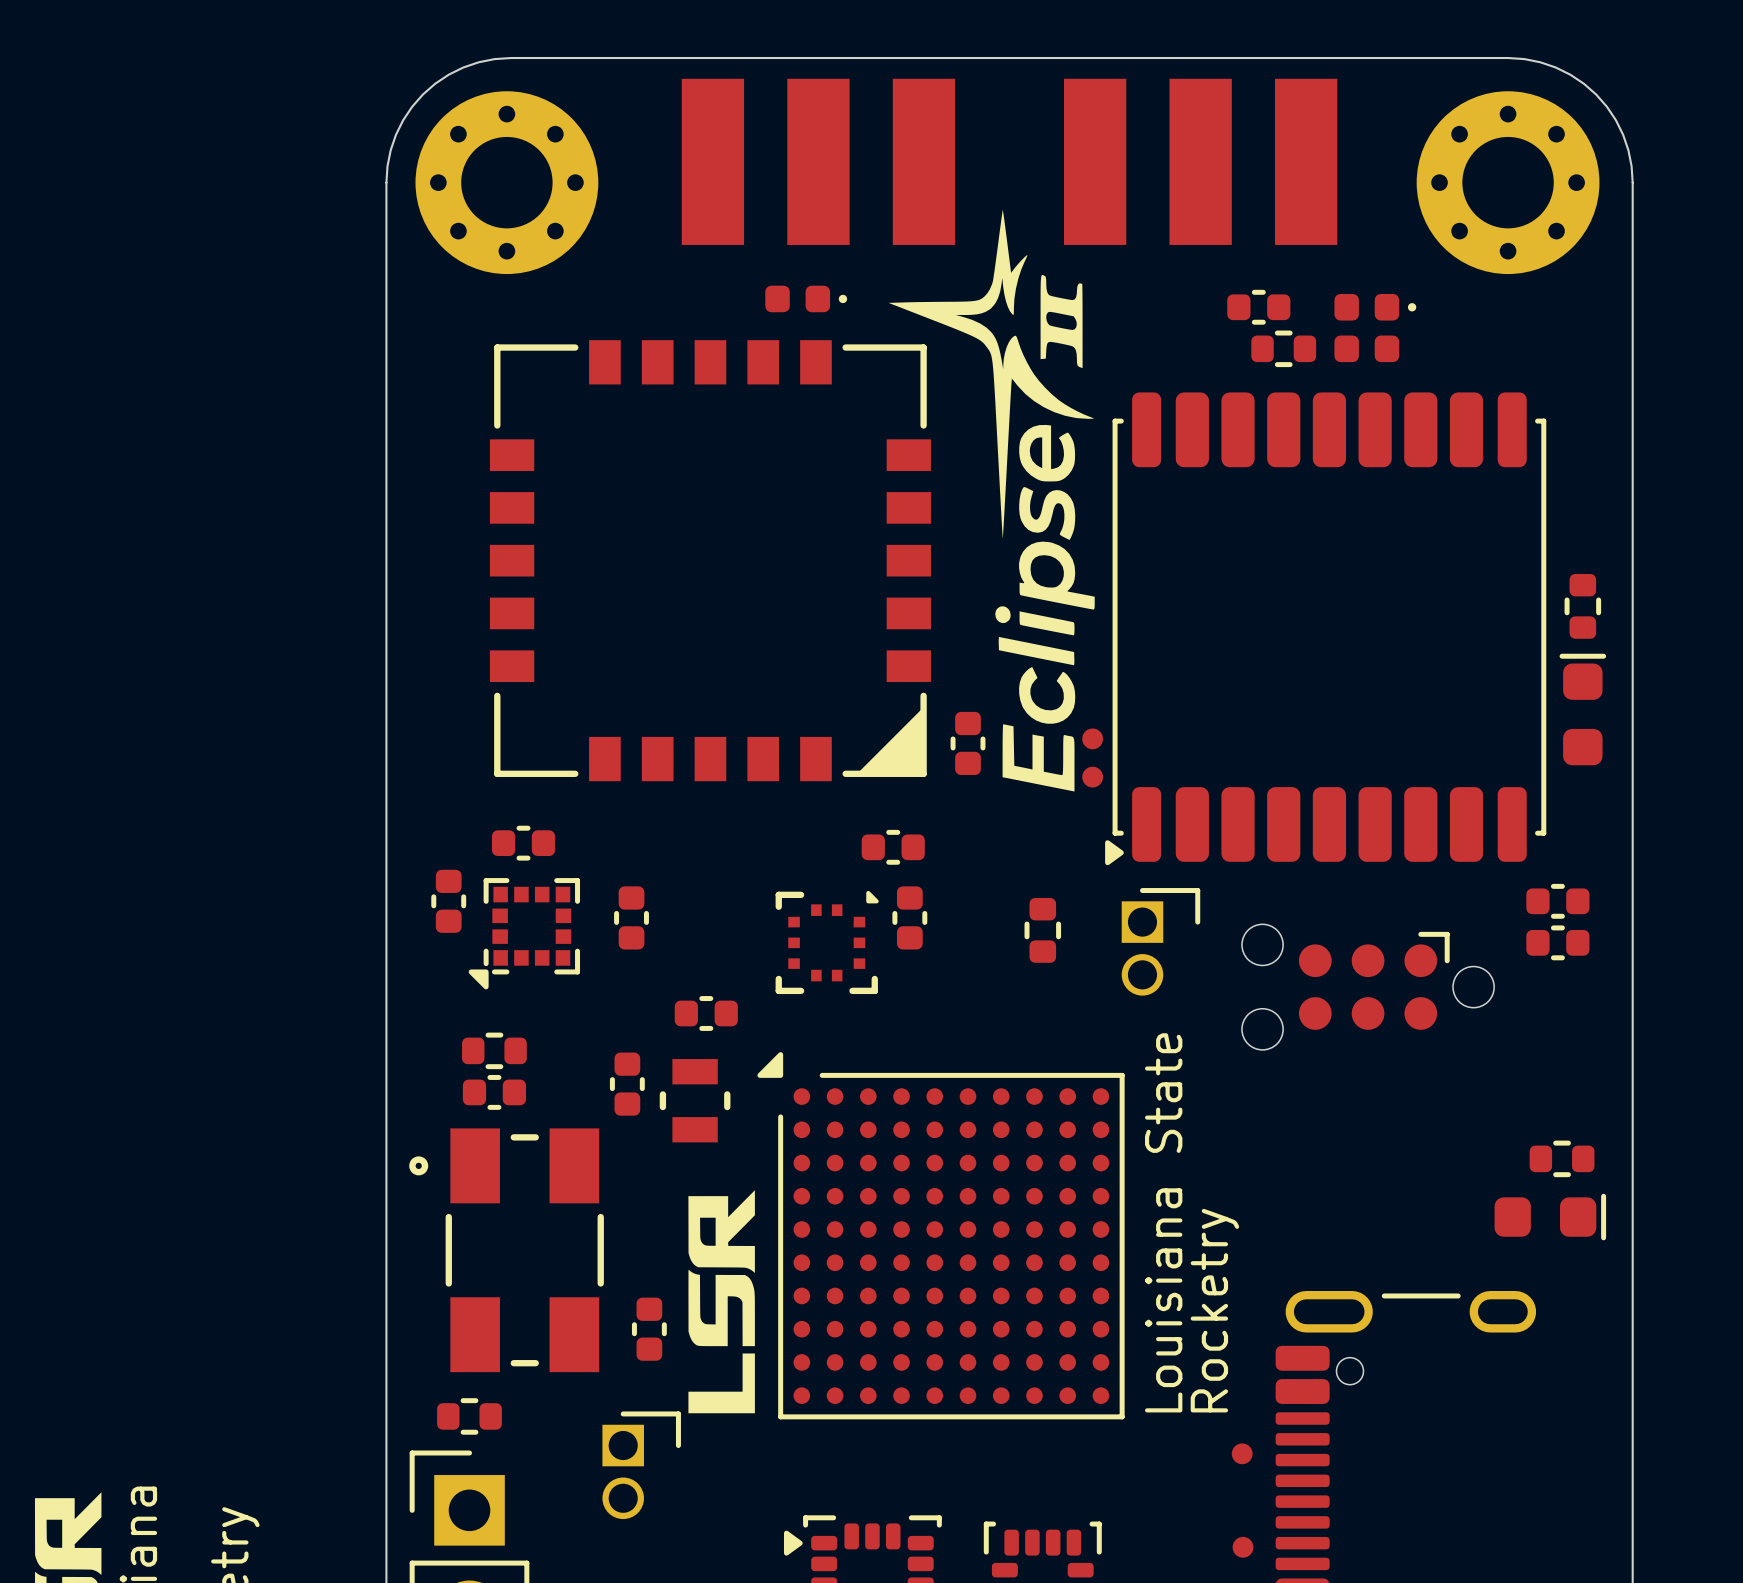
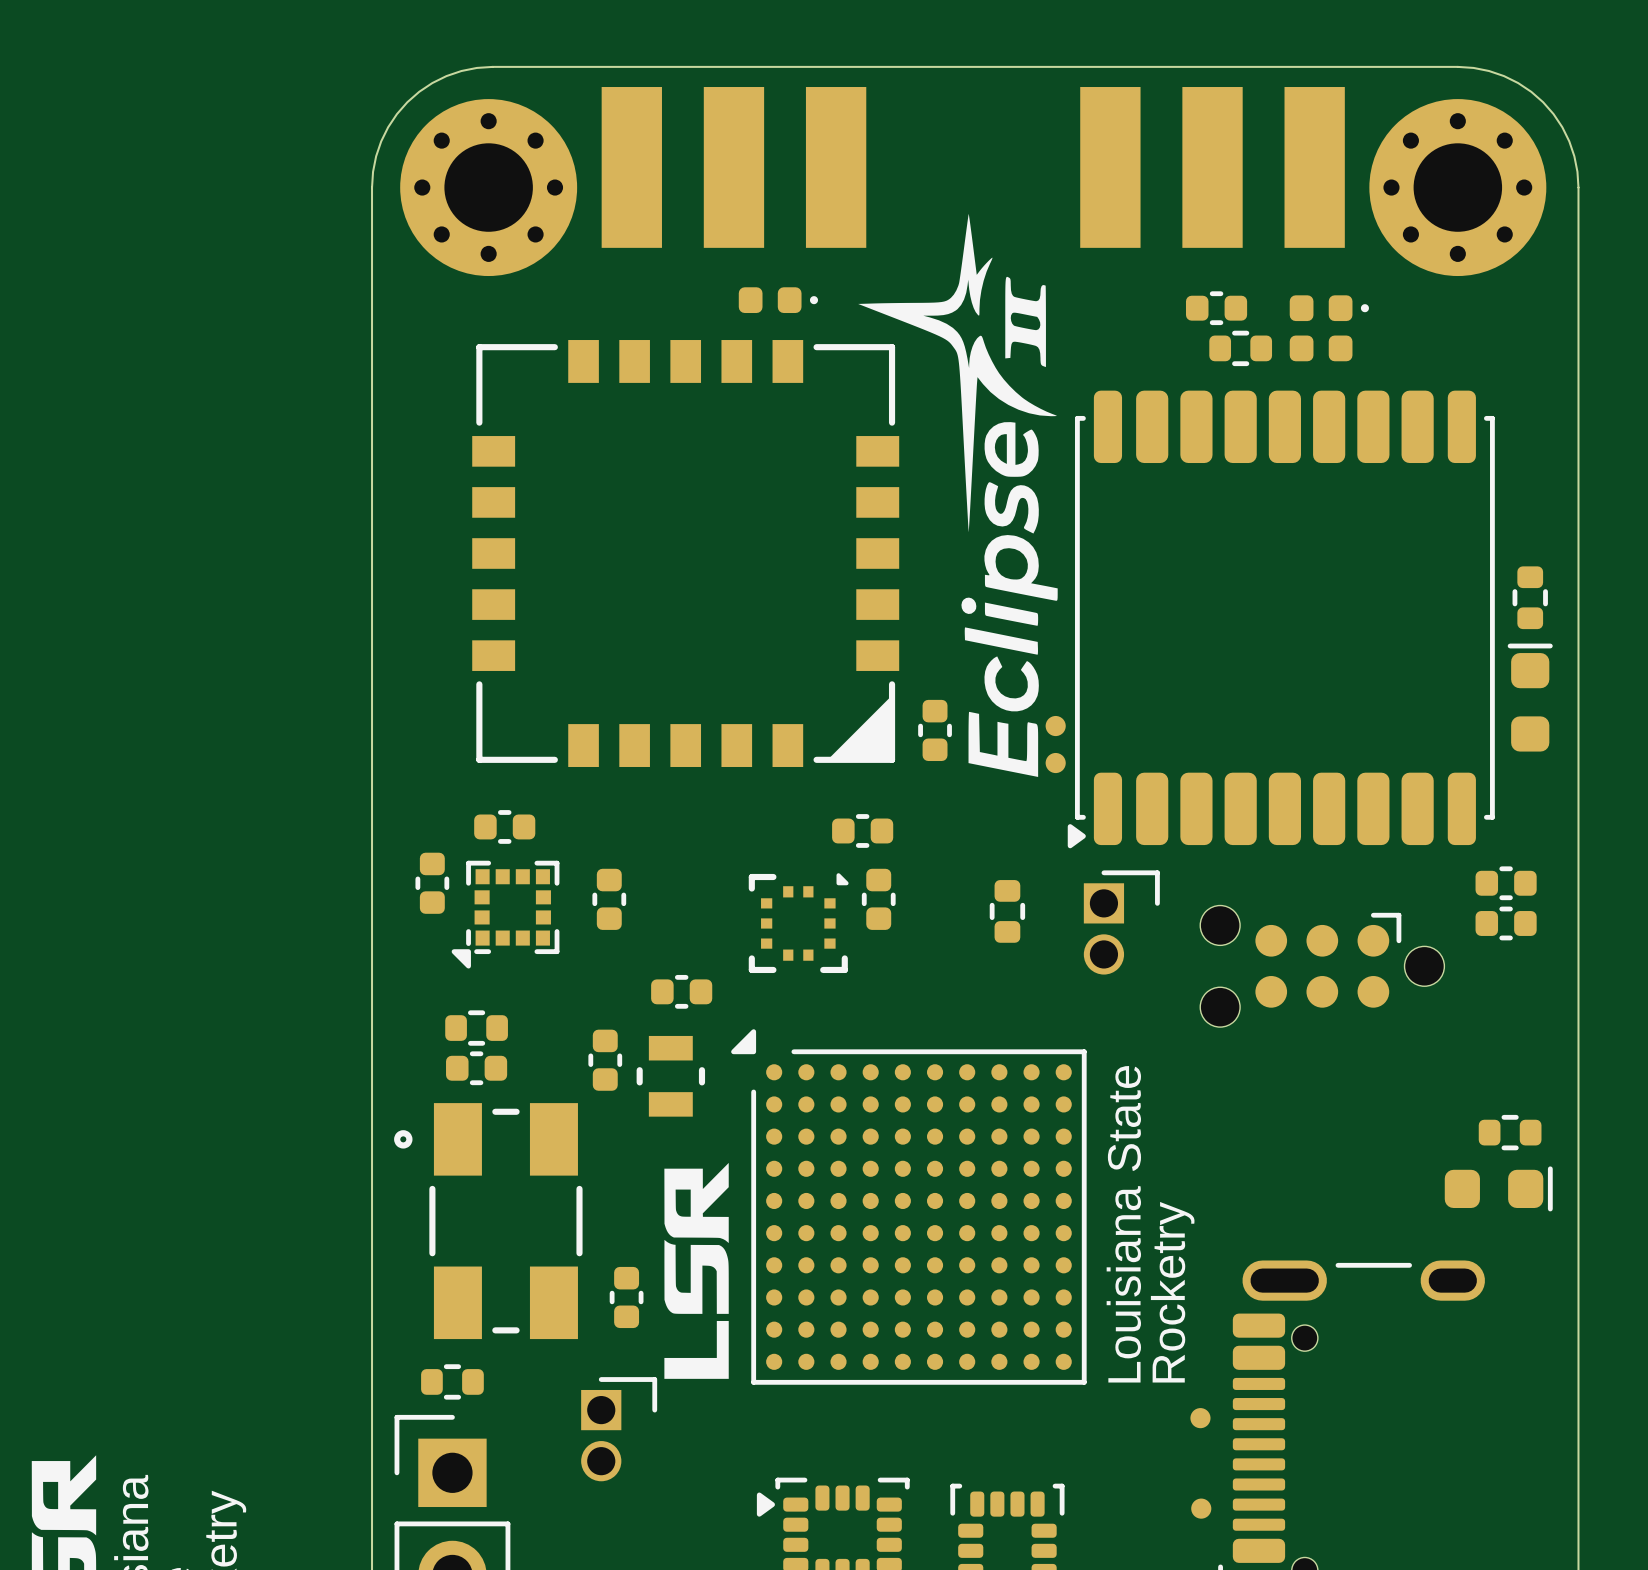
part position: (818, 161) -> (733, 167)
part position: (1200, 161) -> (1212, 167)

